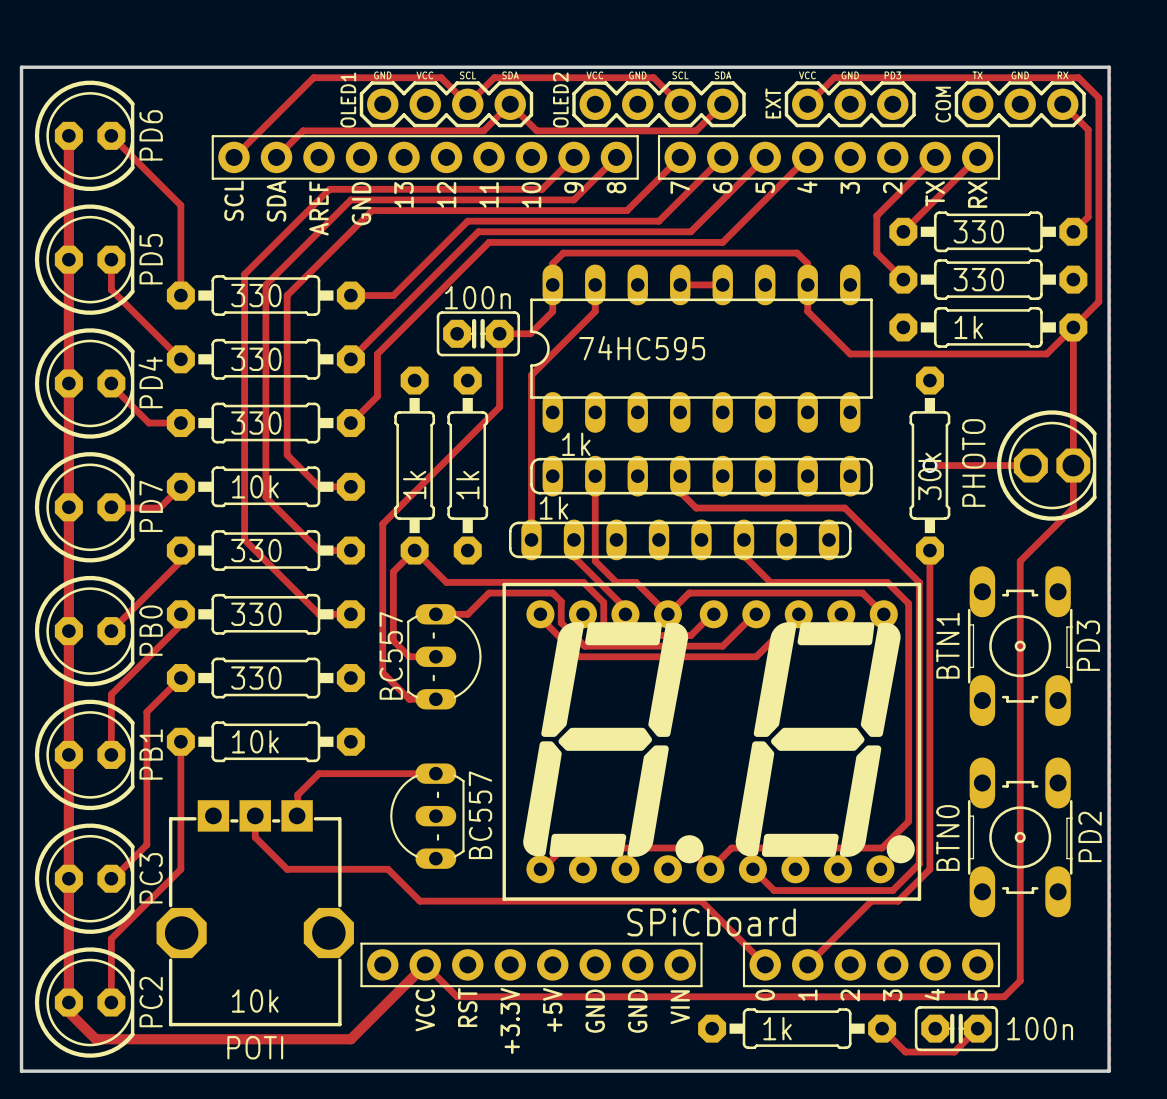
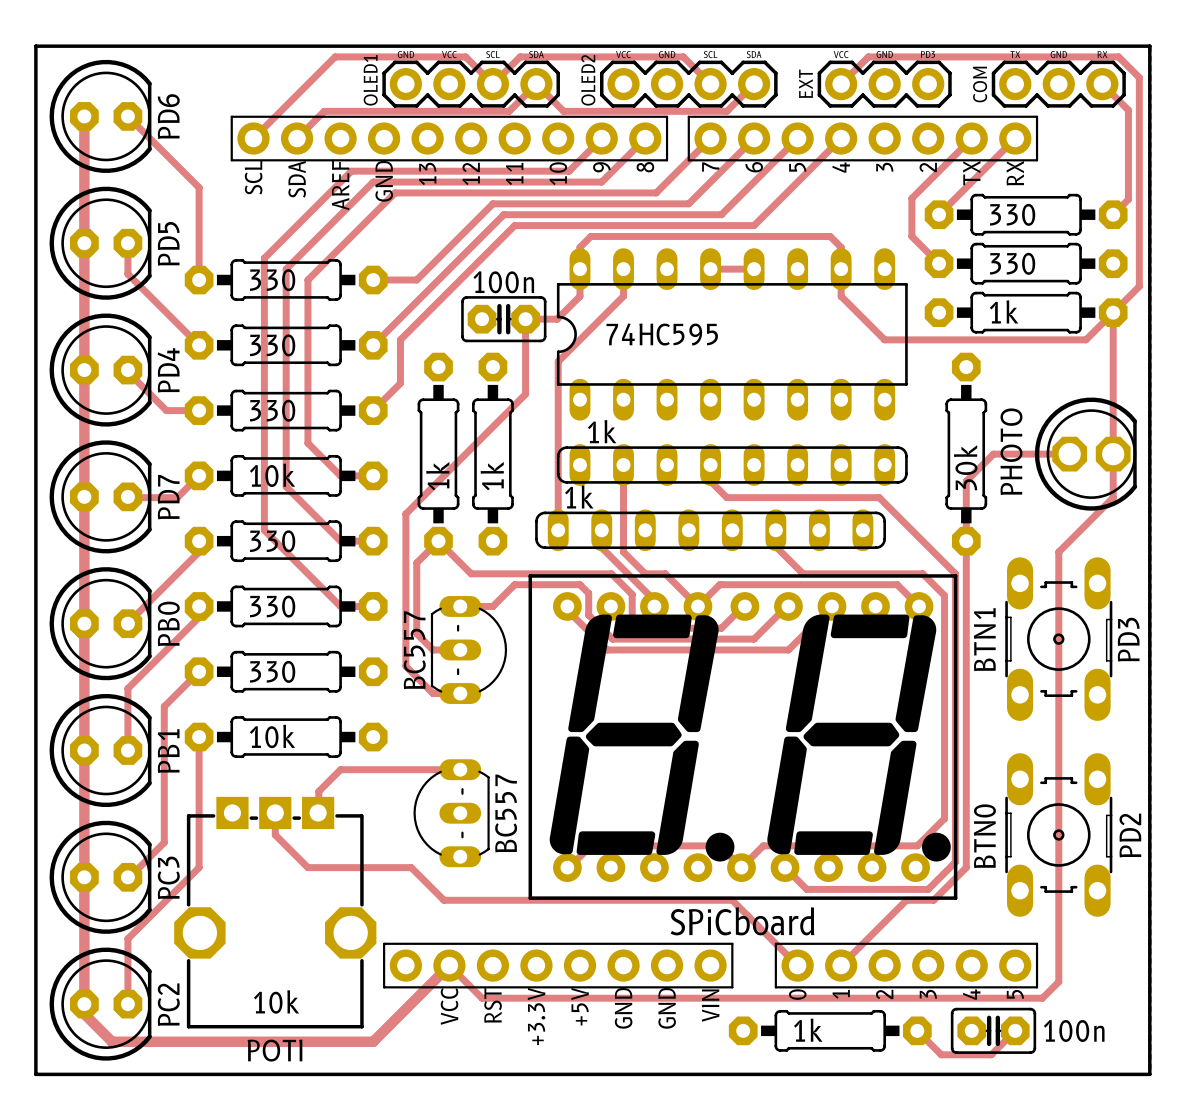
track: (929, 465) (956, 465) -> (966, 541) (966, 481) (993, 454)
via: (929, 465) -> none

